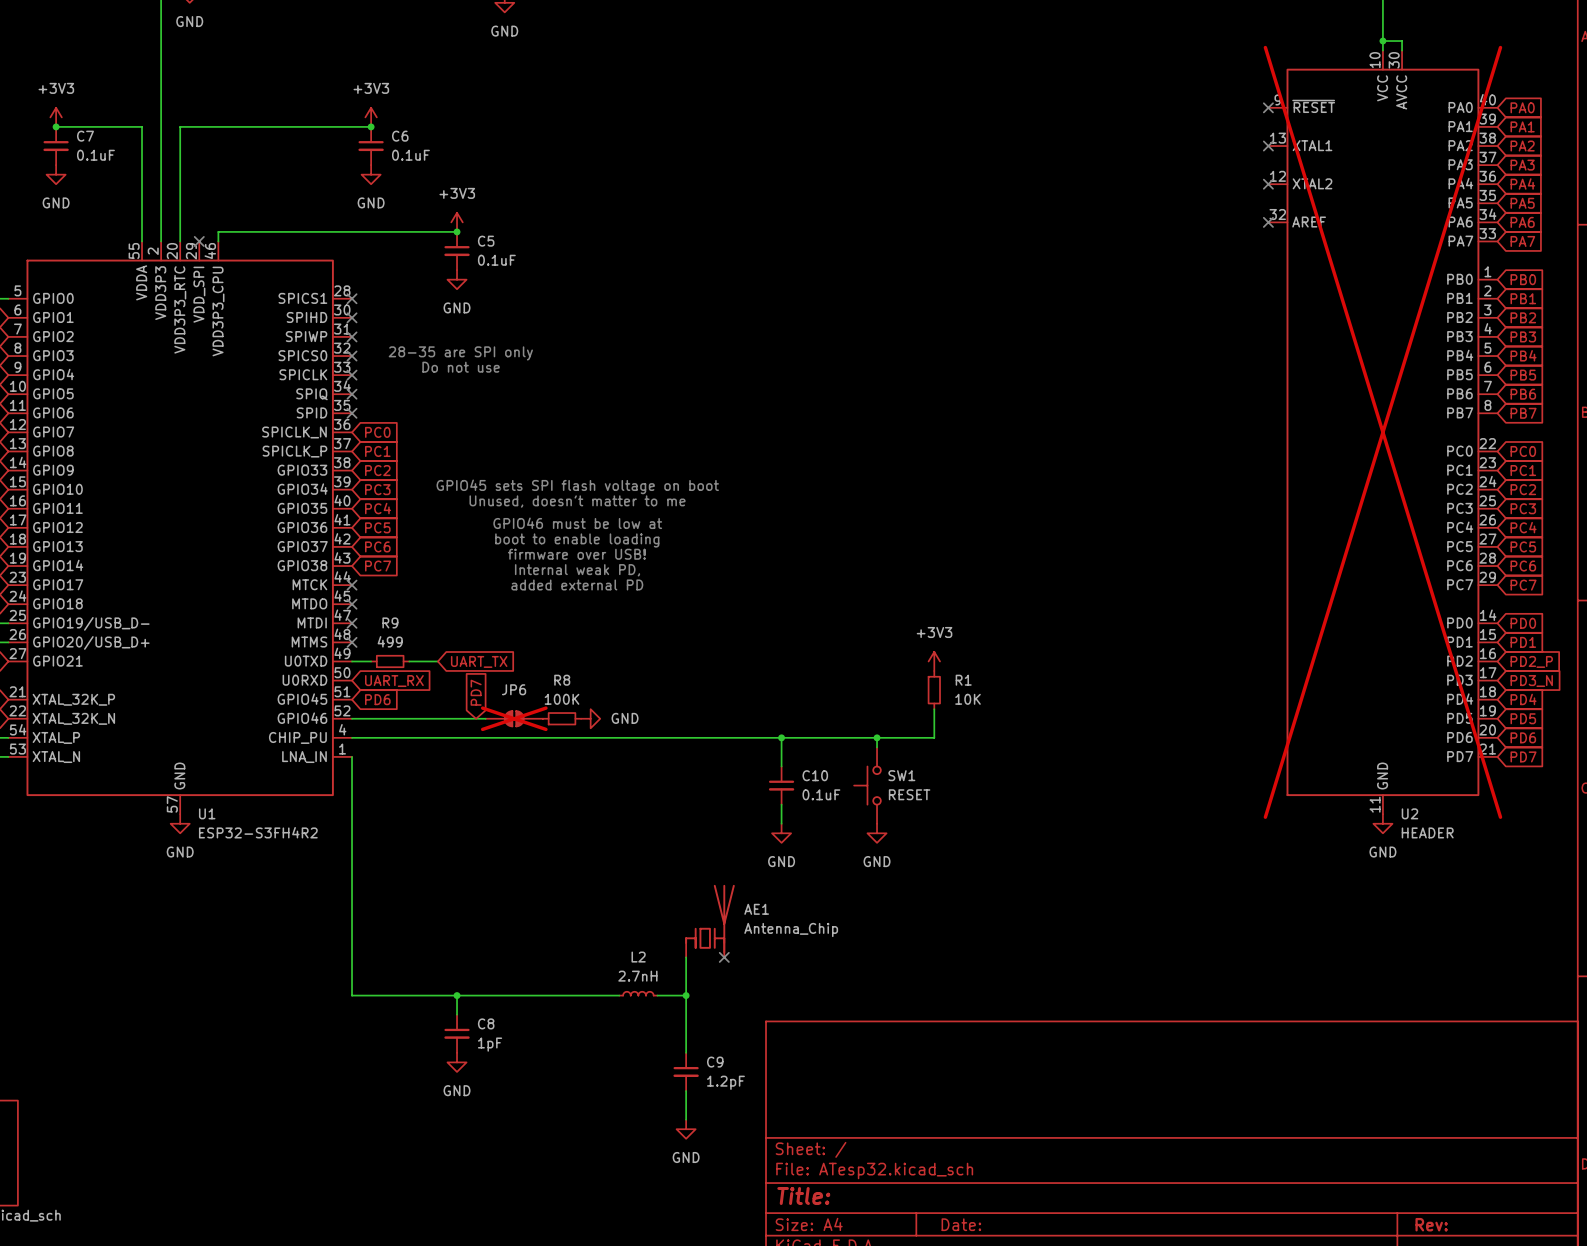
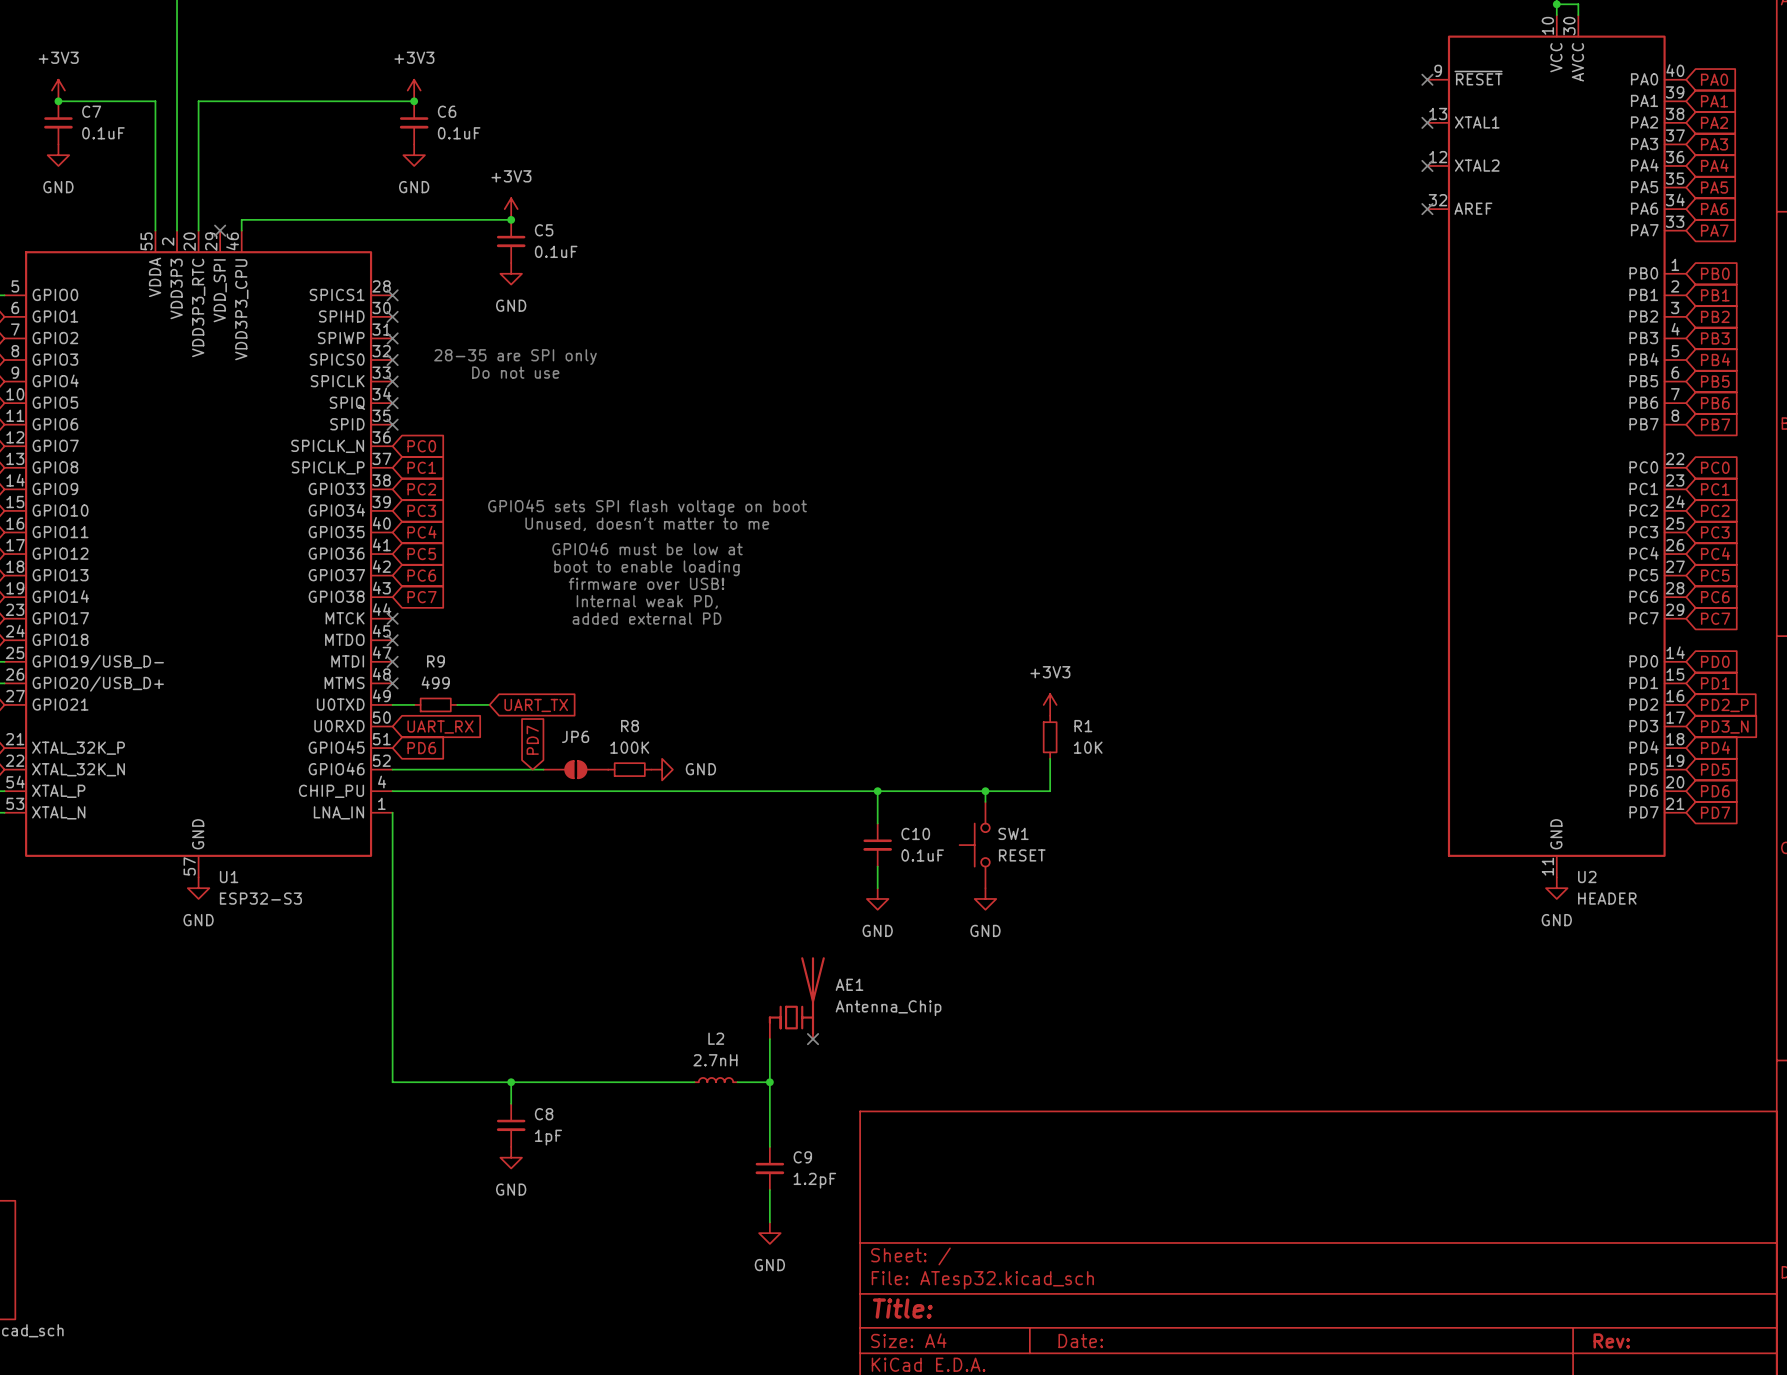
U2 do-not-place cross: (1382, 432) -> none
JP6 do-not-place cross: (514, 718) -> none
U1 value: ESP32-S3FH4R2 (258, 832) -> ESP32-S3 (260, 898)

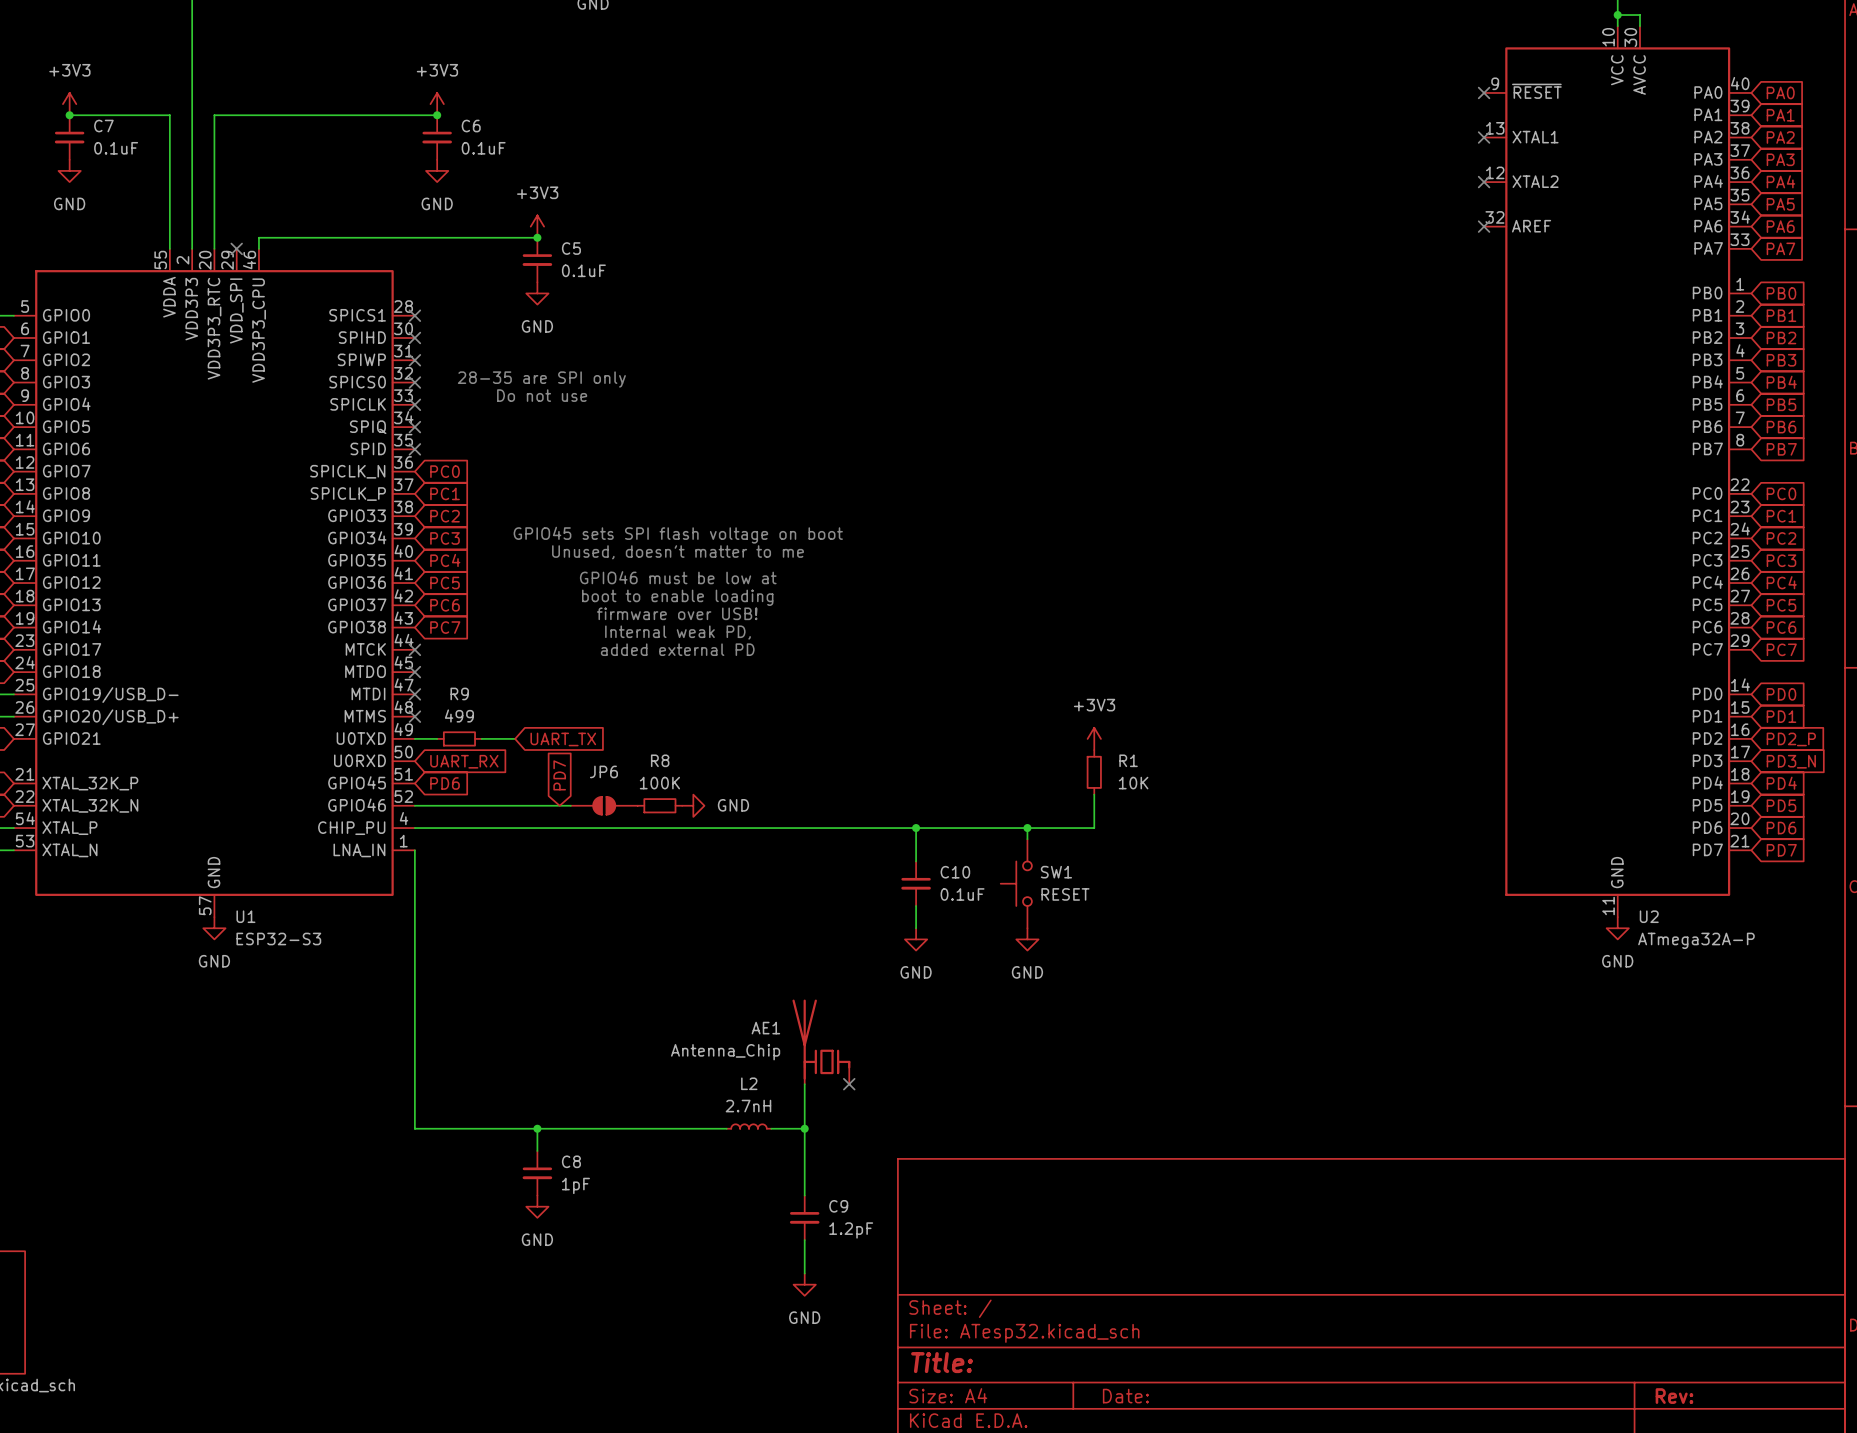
U2 value: HEADER (1607, 898) -> ATmega32A-P (1696, 940)
AE1 flip: as is (796, 995) -> left-right (821, 1039)

